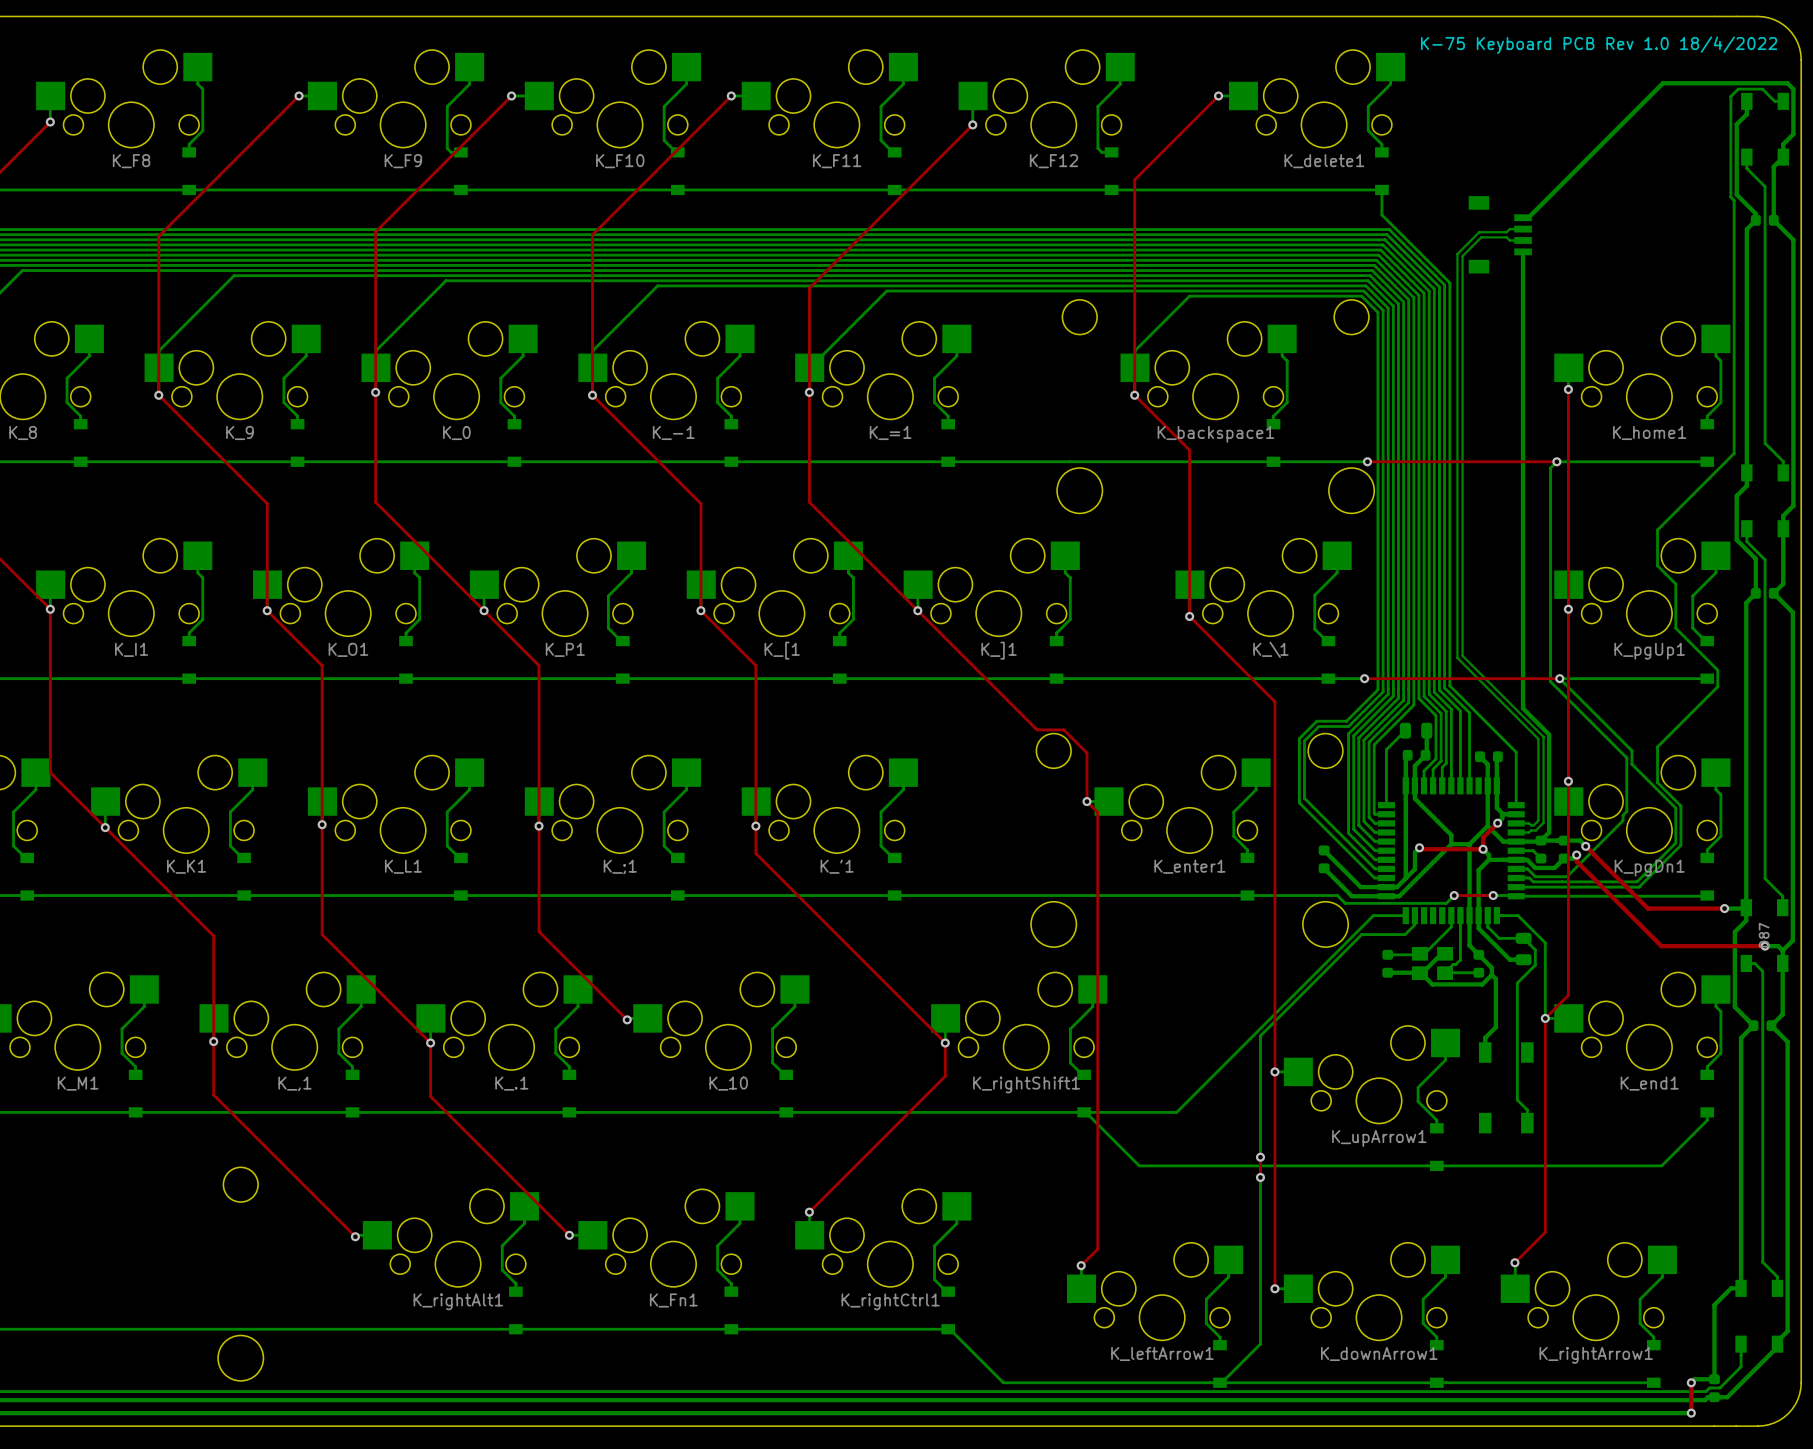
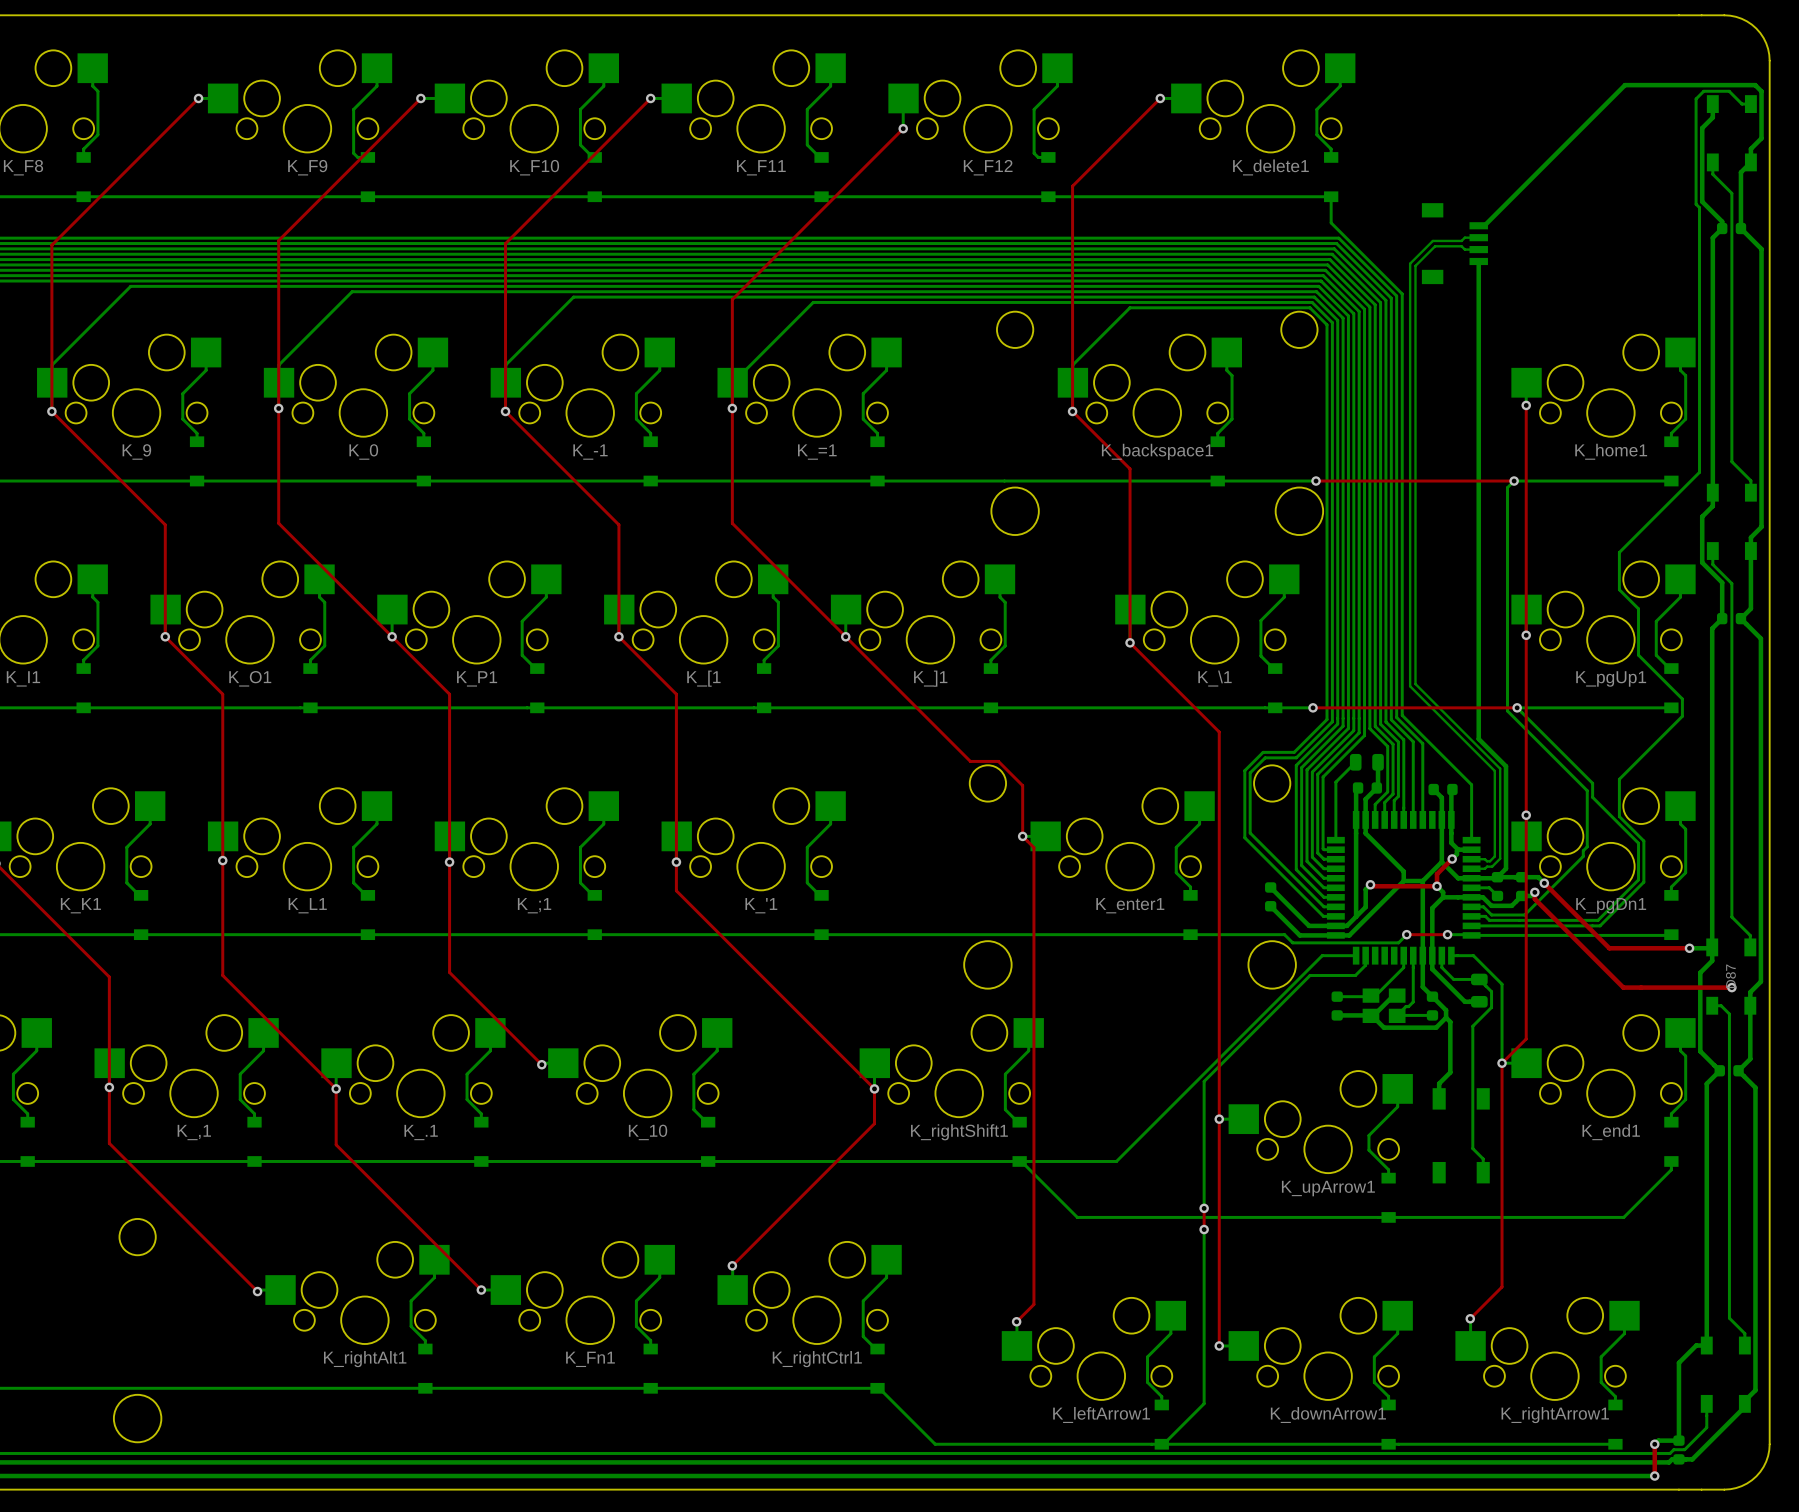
text: K-75 Keyboard PCB Rev 1.0 18/4/2022 (1599, 45) -> none
bottom track: (1765, 946) (1778, 946) (1782, 950) -> none

